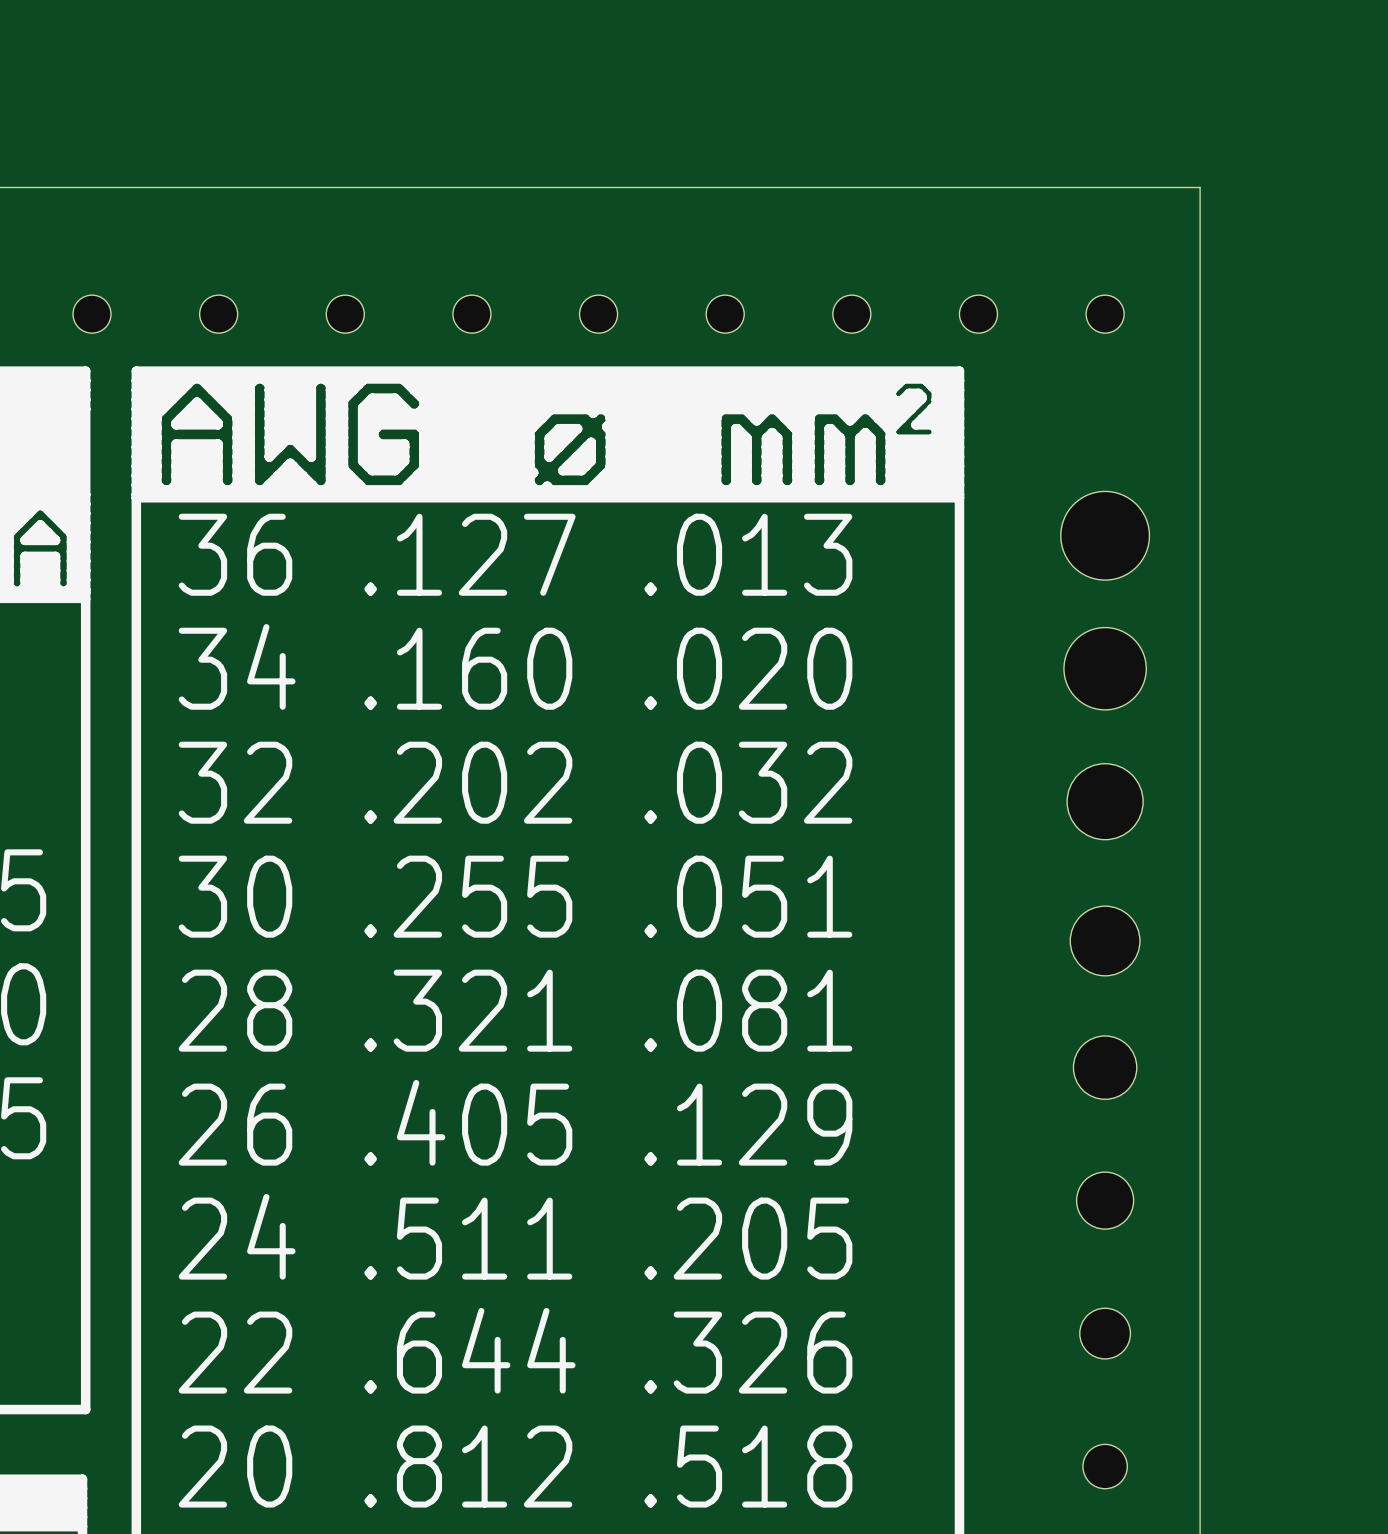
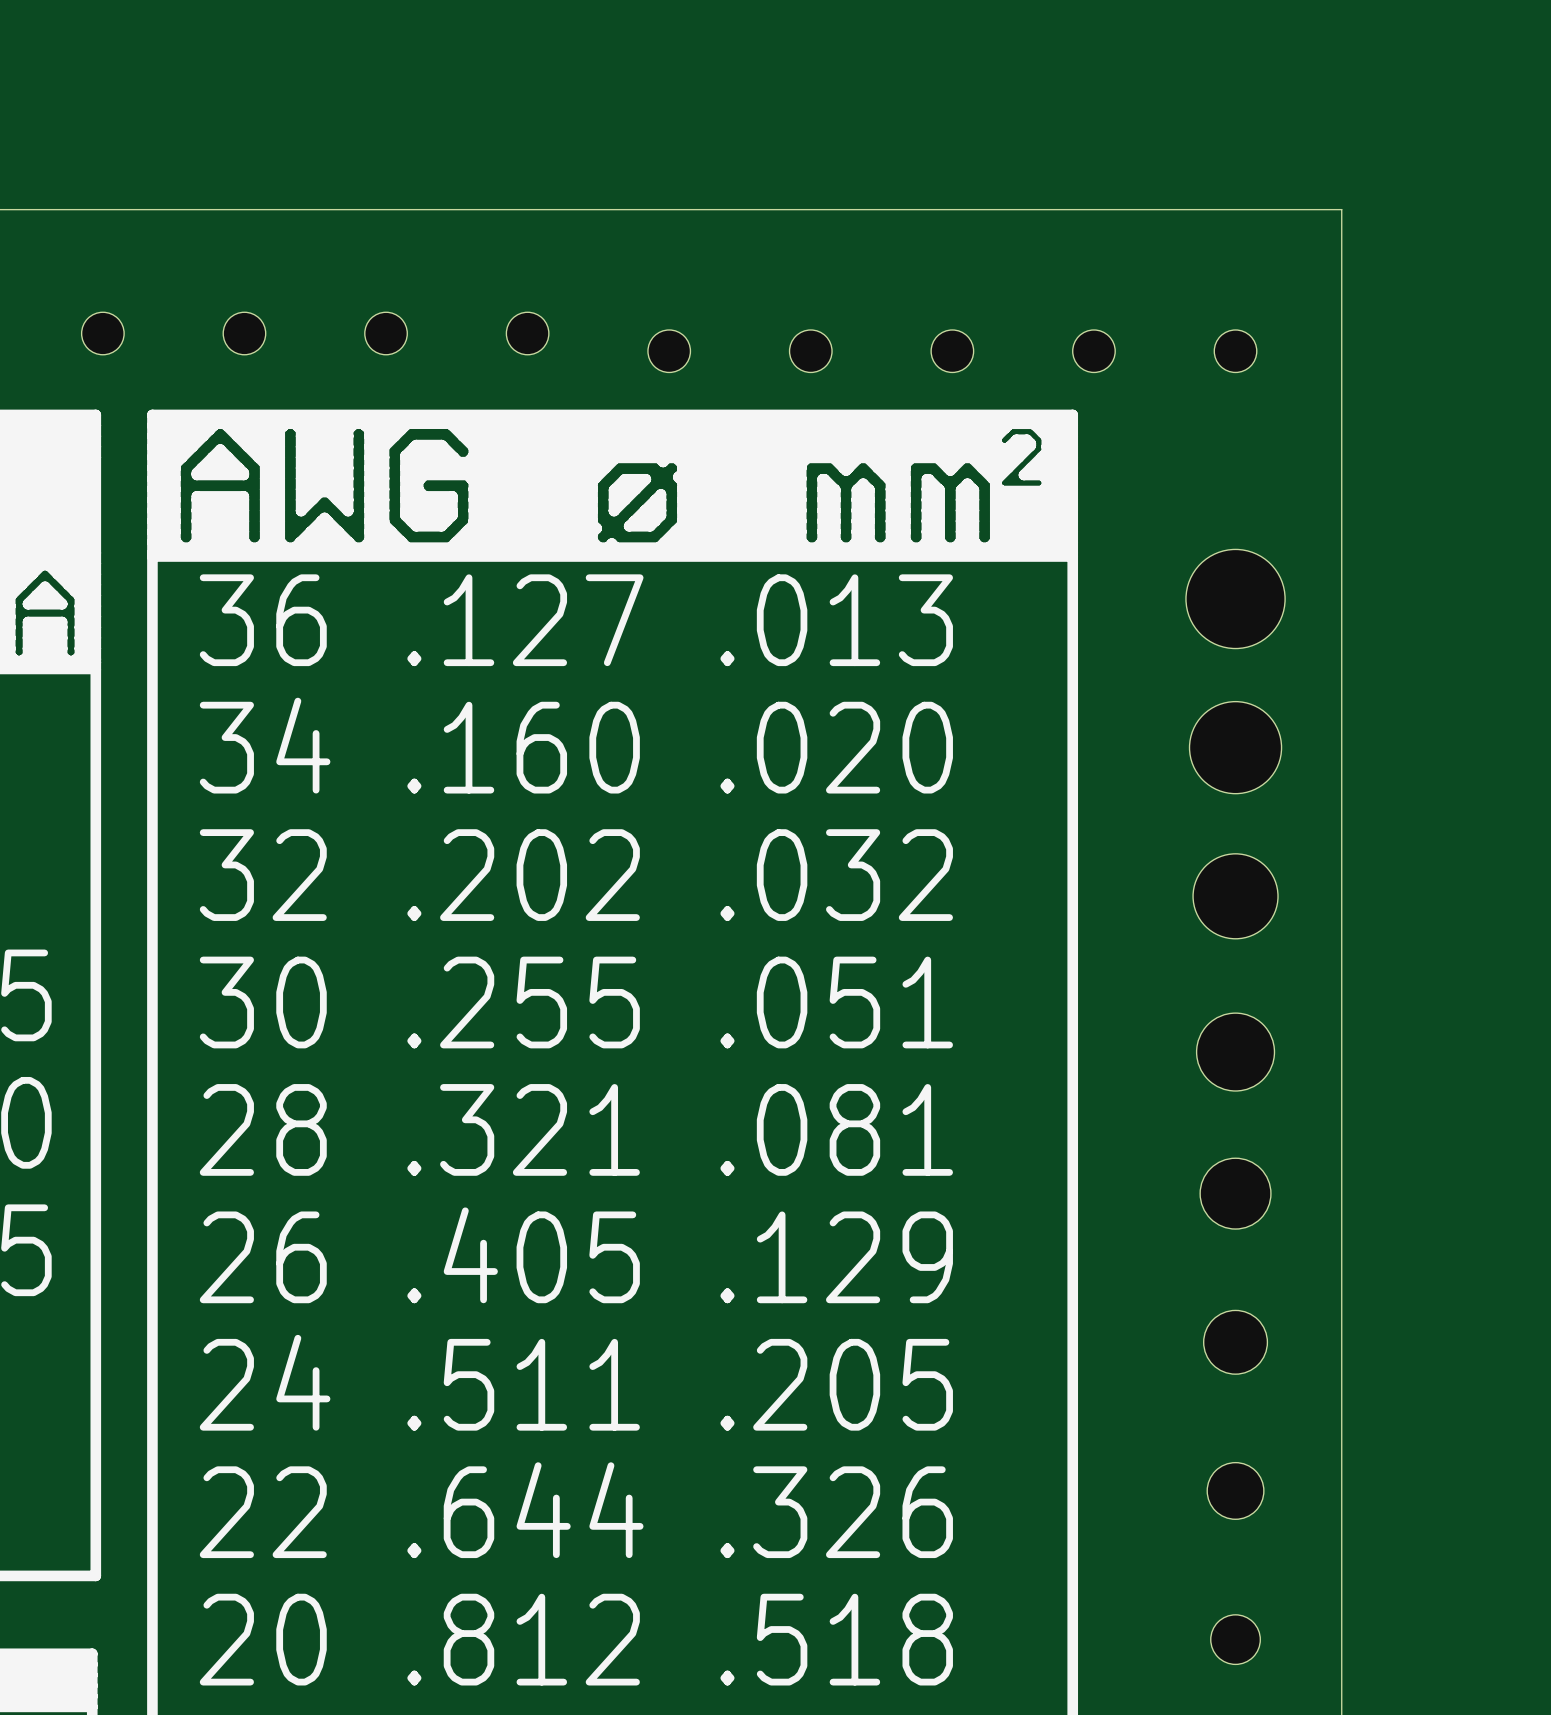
hole position: (92, 314) -> (102, 333)
hole position: (218, 314) -> (244, 333)
hole position: (345, 314) -> (386, 333)
hole position: (471, 314) -> (527, 333)

